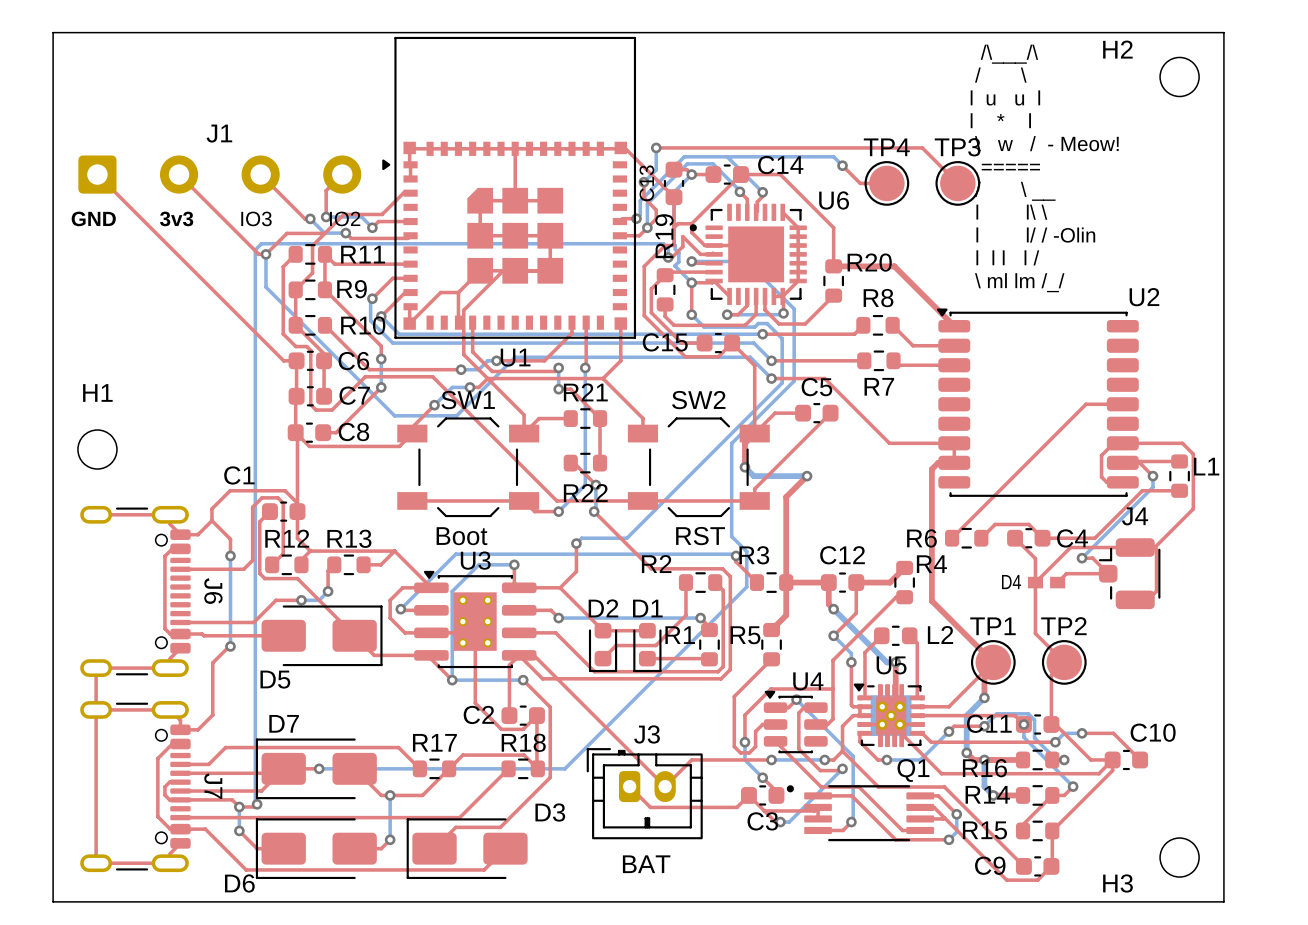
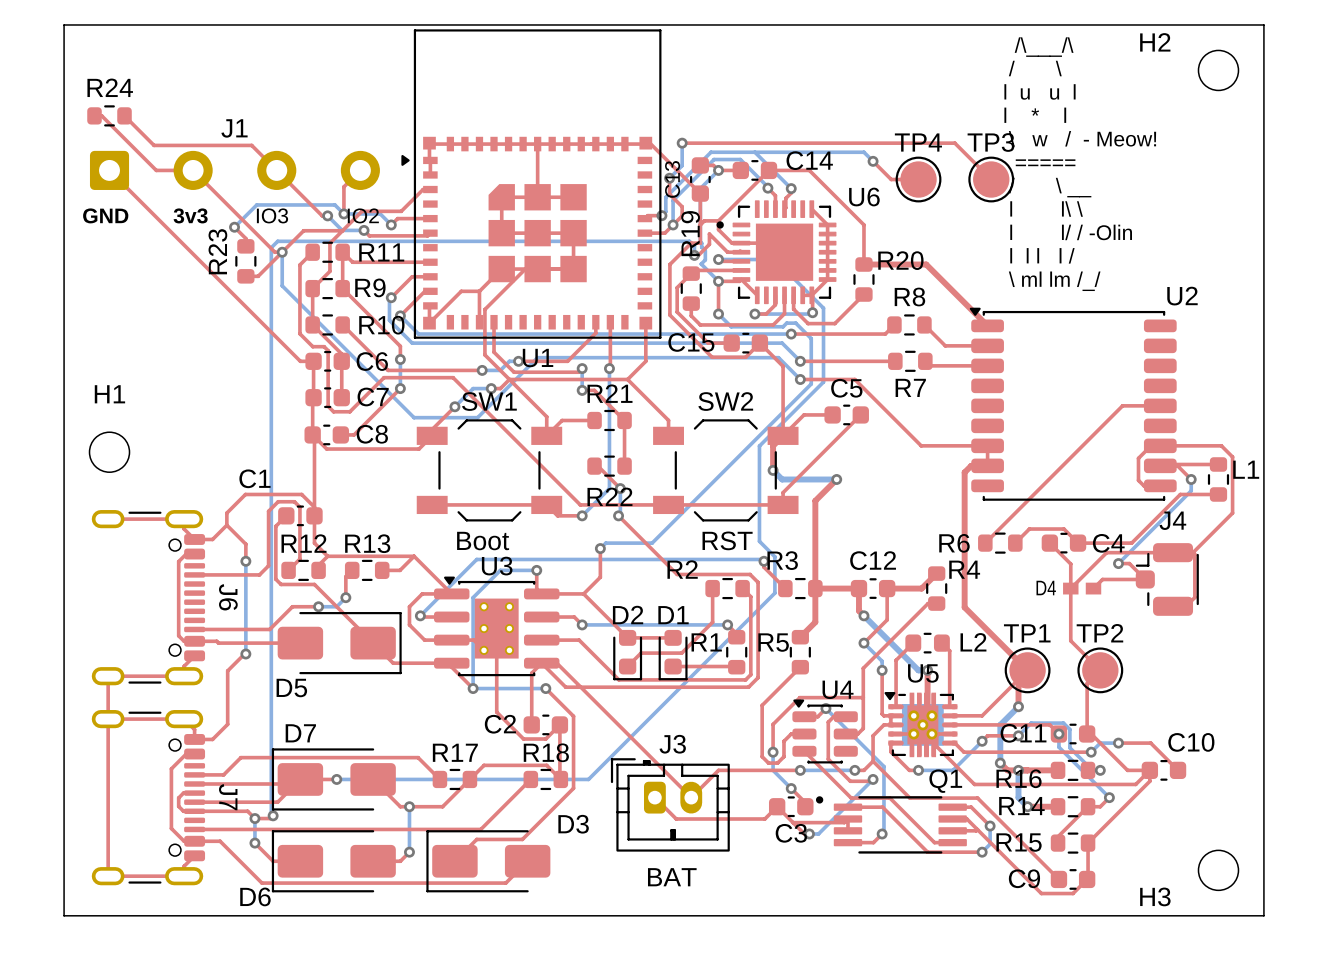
top track: none -> (94, 115) (101, 115) (156, 170) (193, 170)
R24: none -> (109, 115)
top track: none -> (124, 115) (154, 145) (251, 145) (276, 170)
bottom track: none -> (343, 213) (334, 204) (256, 204) (234, 227)
top track: none -> (234, 227) (245, 238) (245, 246)
via: none -> (234, 227)
top track: none -> (282, 252) (258, 276) (245, 276)
R23: none -> (245, 261)

